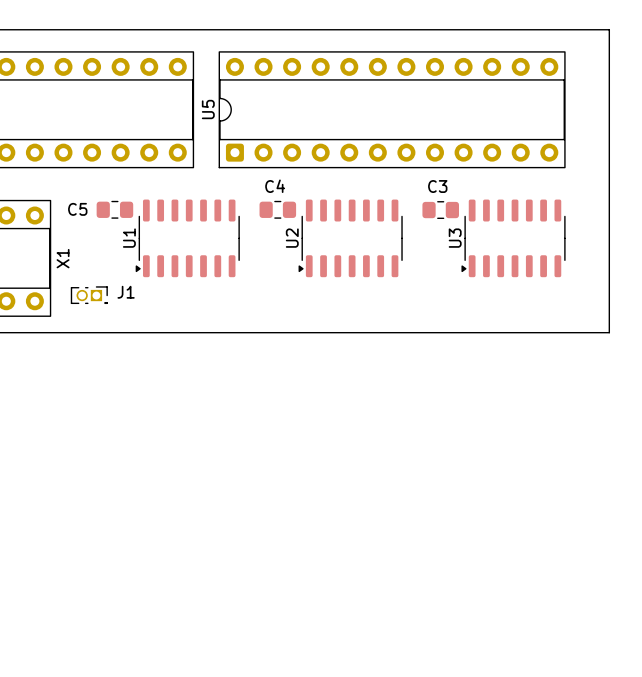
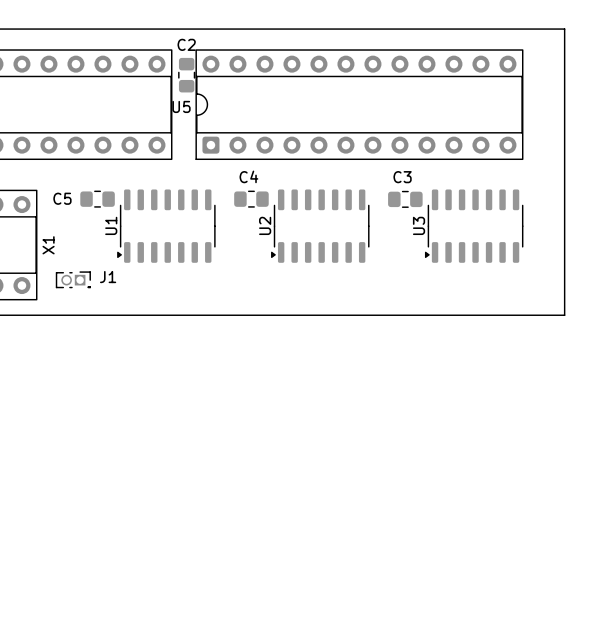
C2: none -> (186, 75)
U5 name rotation: 0° (208, 109) -> 90° clockwise (181, 106)

